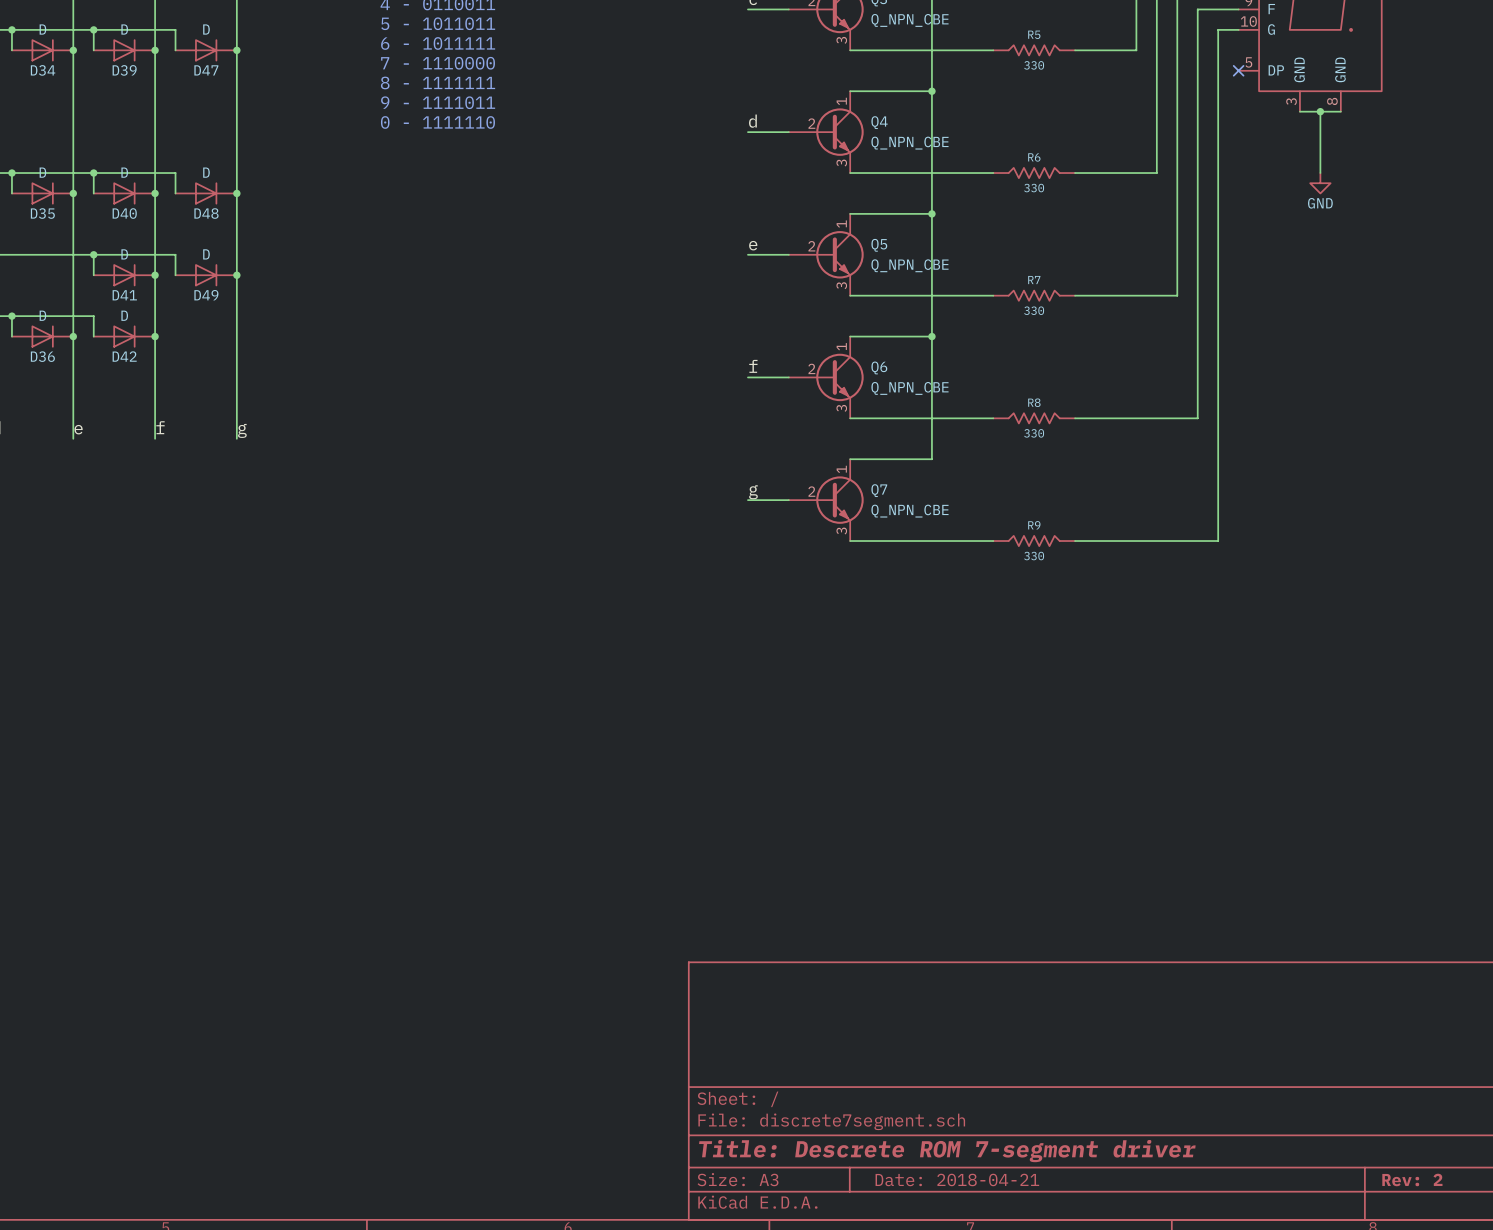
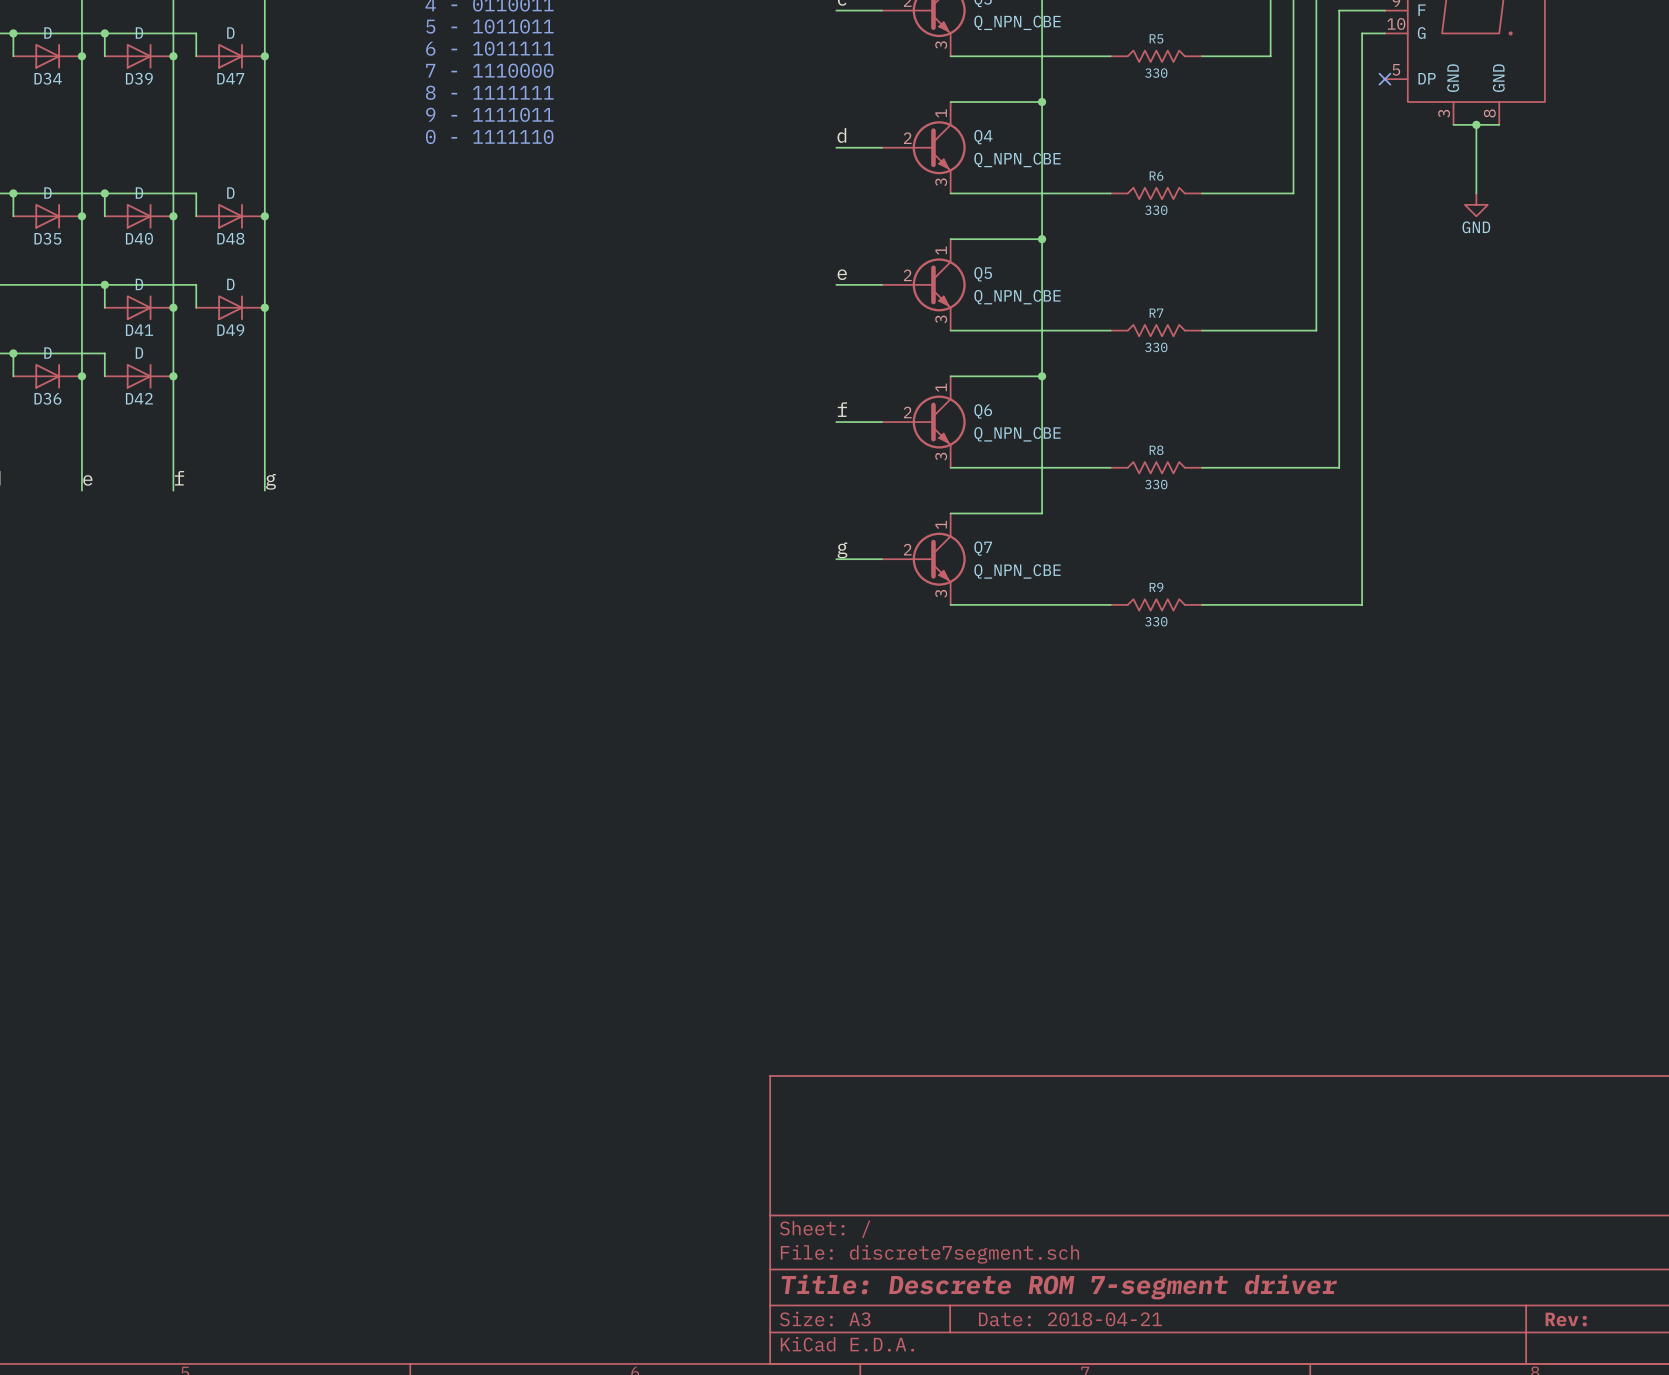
title block: Rev: 2 (1412, 1179) -> Rev: (1566, 1319)

